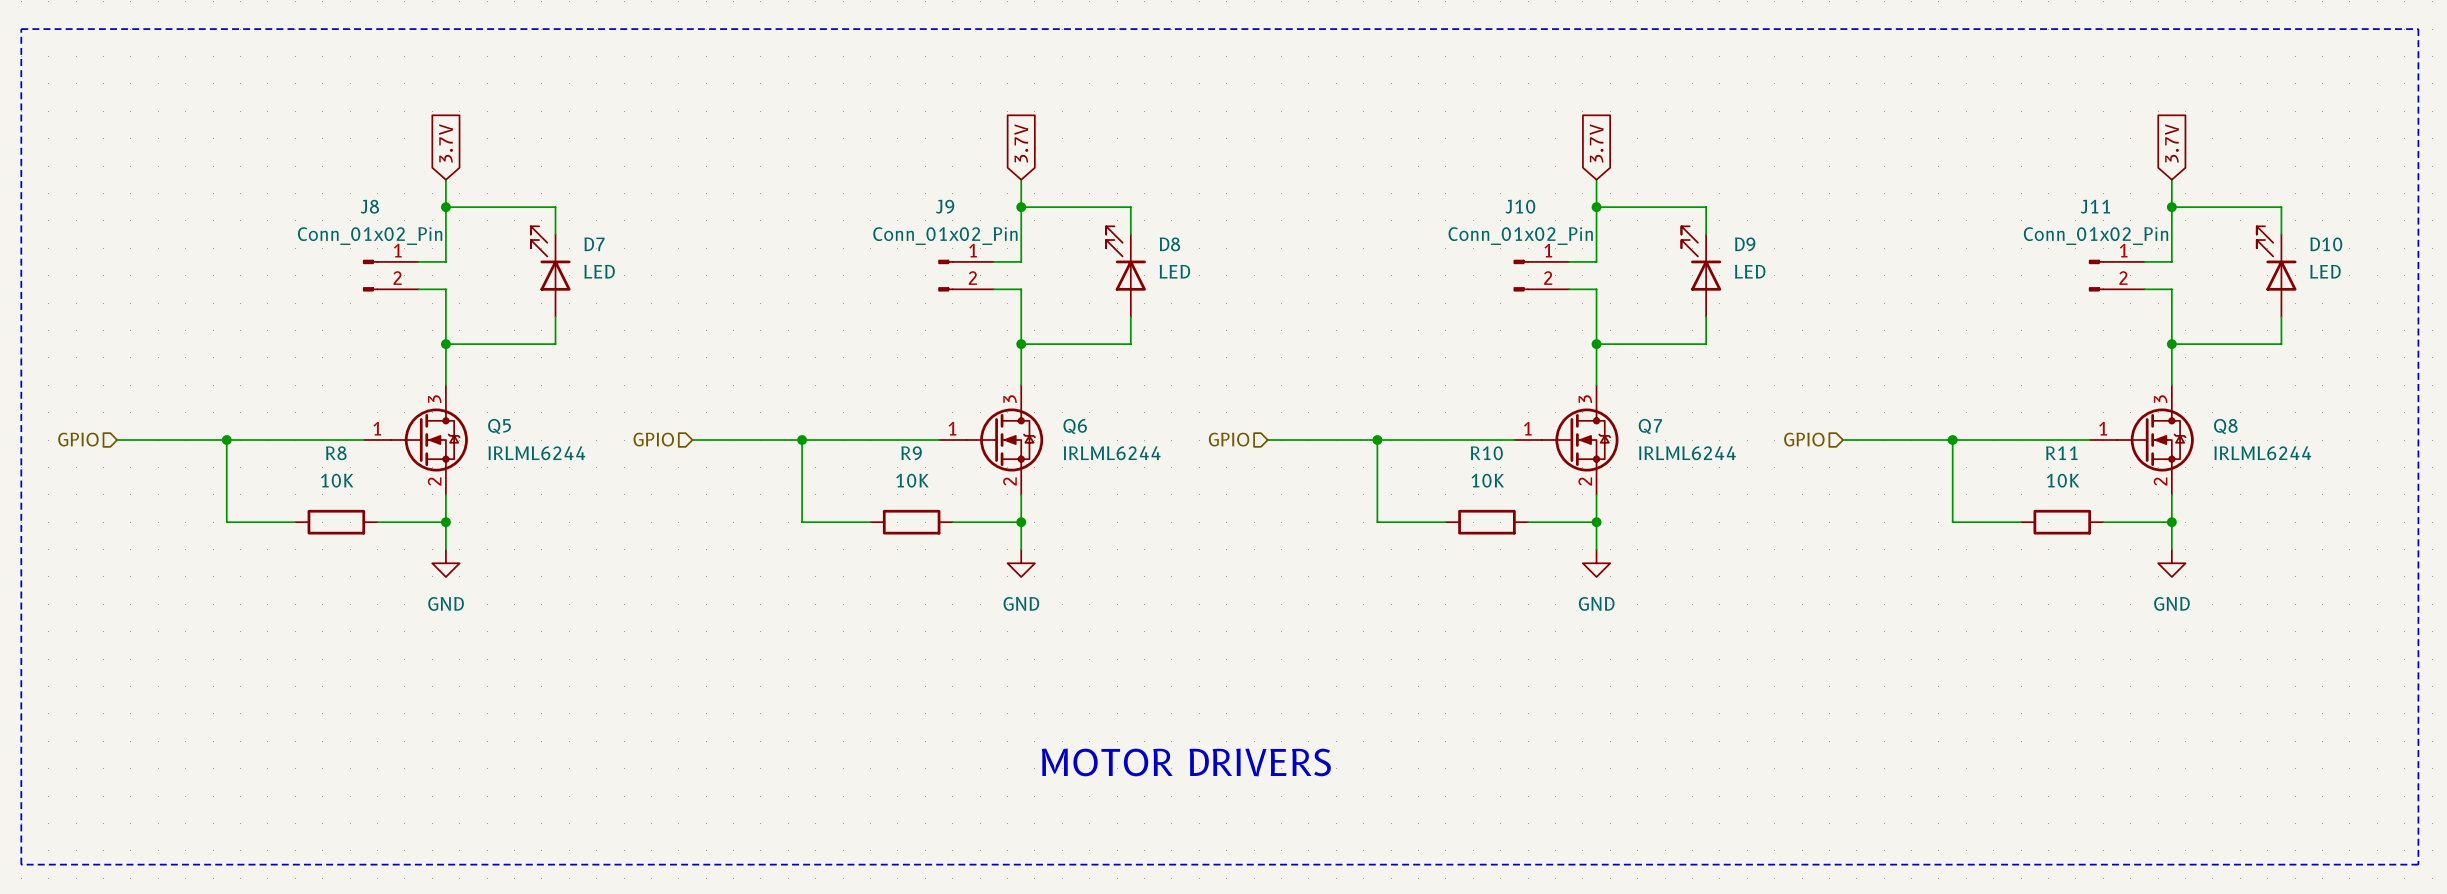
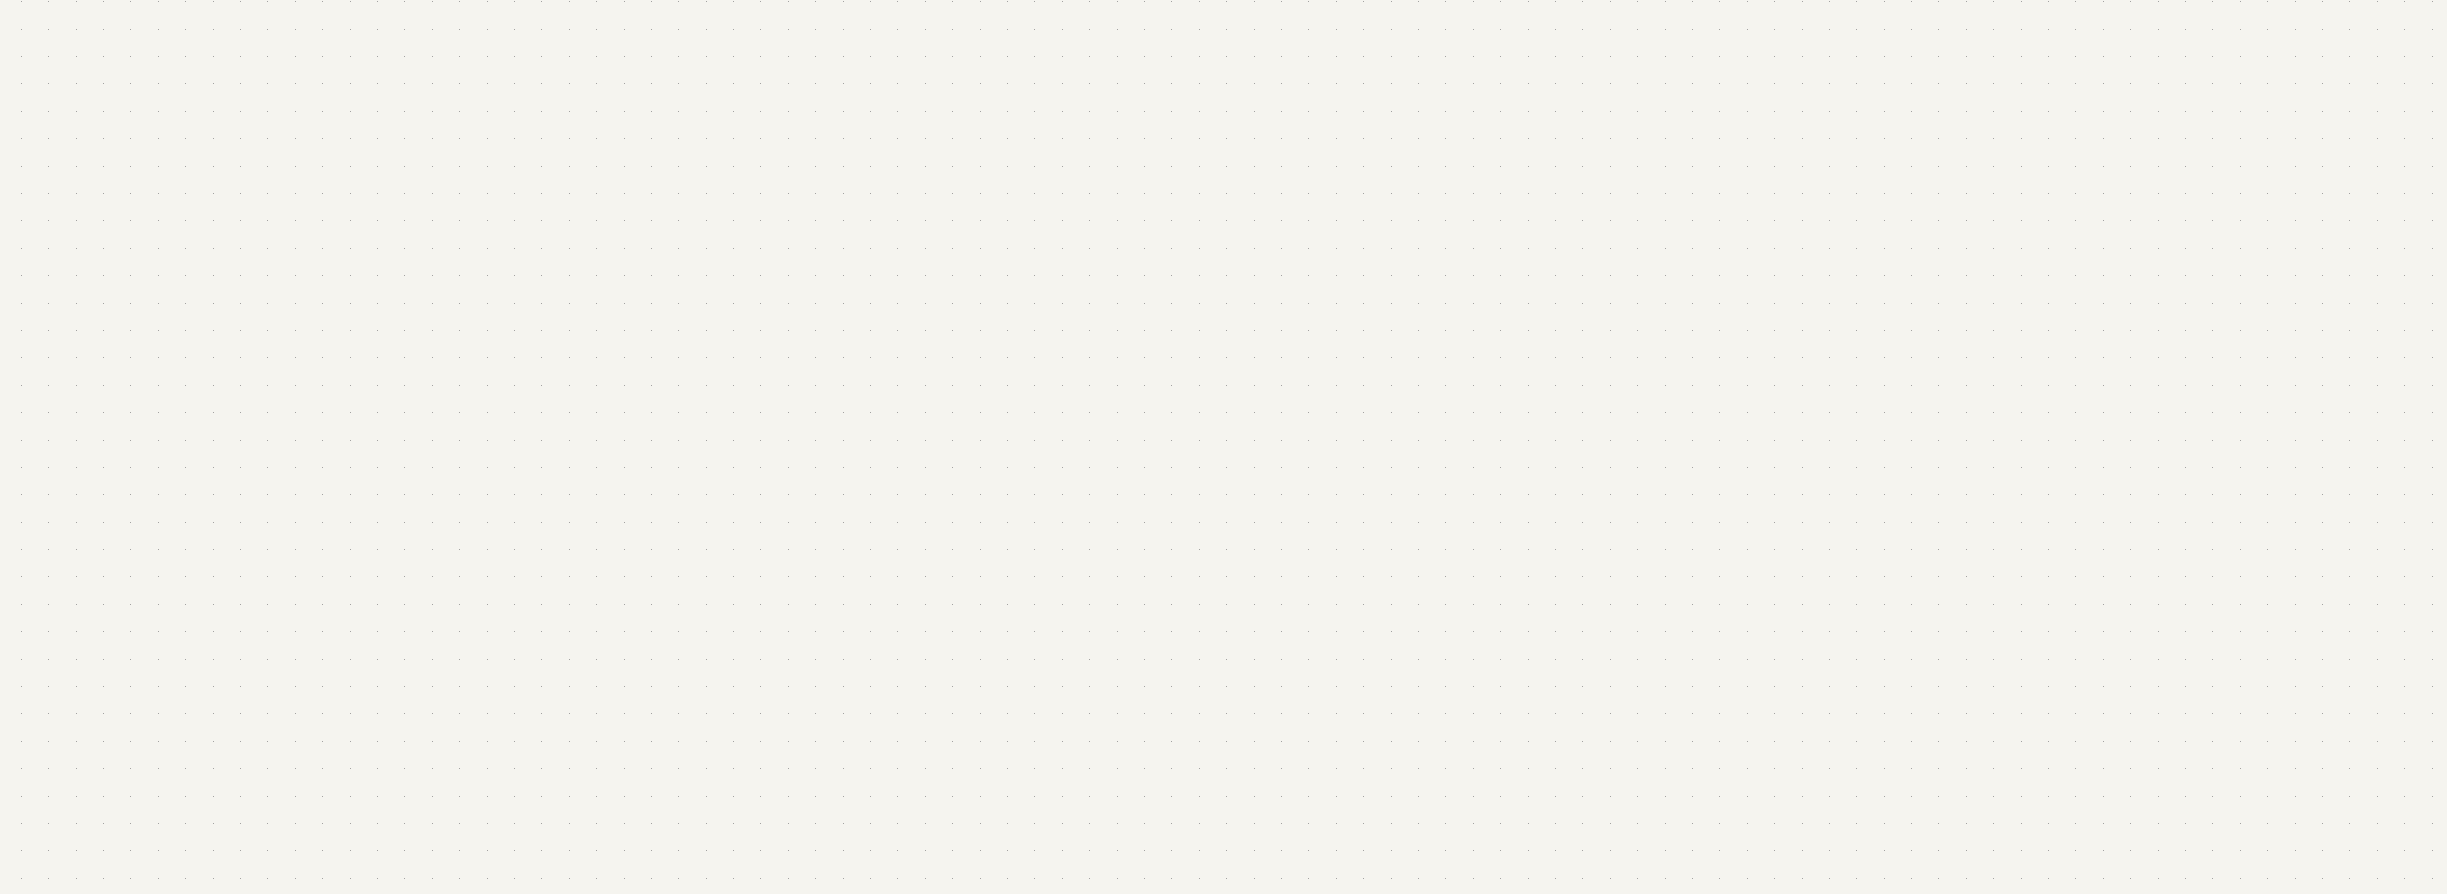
line: (21, 29) (2418, 29) (2418, 864) (21, 864) (21, 29) -> none
global label: 3.7V (446, 143) -> none
global label: 3.7V (1021, 143) -> none
global label: 3.7V (1596, 143) -> none
global label: 3.7V (2171, 143) -> none
wire: (445, 179) (445, 261) (418, 261) -> none
wire: (1021, 179) (1021, 261) (993, 261) -> none
wire: (1596, 179) (1596, 261) (1569, 261) -> none
wire: (2171, 179) (2171, 261) (2144, 261) -> none
wire: (445, 207) (555, 207) (555, 234) -> none
junction: (445, 207) -> none
wire: (1021, 207) (1130, 207) (1130, 234) -> none
junction: (1021, 207) -> none
wire: (1596, 207) (1706, 207) (1706, 234) -> none
junction: (1596, 207) -> none
wire: (2171, 207) (2281, 207) (2281, 234) -> none
junction: (2171, 207) -> none
D7: LED (550, 271) -> none
D8: LED (1126, 271) -> none
D9: LED (1701, 271) -> none
D10: LED (2276, 271) -> none
J8: Conn_01x02_Pin (390, 275) -> none
J9: Conn_01x02_Pin (966, 275) -> none
J10: Conn_01x02_Pin (1541, 275) -> none
J11: Conn_01x02_Pin (2116, 275) -> none
wire: (418, 289) (445, 289) (445, 385) -> none
wire: (993, 289) (1021, 289) (1021, 385) -> none
wire: (1569, 289) (1596, 289) (1596, 385) -> none
wire: (2144, 289) (2171, 289) (2171, 385) -> none
wire: (555, 316) (555, 344) (445, 344) -> none
wire: (1130, 316) (1130, 344) (1021, 344) -> none
wire: (1706, 316) (1706, 344) (1596, 344) -> none
wire: (2281, 316) (2281, 344) (2171, 344) -> none
junction: (445, 344) -> none
junction: (1021, 344) -> none
junction: (1596, 344) -> none
junction: (2171, 344) -> none
hierarchical label: GPIO (78, 439) -> none
hierarchical label: GPIO (653, 439) -> none
hierarchical label: GPIO (1229, 439) -> none
hierarchical label: GPIO (1804, 439) -> none
wire: (117, 440) (363, 440) -> none
wire: (226, 440) (226, 522) (295, 522) -> none
junction: (226, 440) -> none
Q5: IRLML6244 (415, 440) -> none
wire: (692, 440) (939, 440) -> none
wire: (802, 440) (802, 522) (870, 522) -> none
junction: (802, 440) -> none
Q6: IRLML6244 (991, 440) -> none
wire: (1267, 440) (1514, 440) -> none
wire: (1377, 440) (1377, 522) (1445, 522) -> none
junction: (1377, 440) -> none
Q7: IRLML6244 (1566, 440) -> none
wire: (1843, 440) (2089, 440) -> none
wire: (1952, 440) (1952, 522) (2021, 522) -> none
junction: (1952, 440) -> none
Q8: IRLML6244 (2141, 440) -> none
wire: (445, 494) (445, 549) -> none
wire: (1021, 494) (1021, 549) -> none
wire: (1596, 494) (1596, 549) -> none
wire: (2171, 494) (2171, 549) -> none
R8: 10K (336, 522) -> none
wire: (377, 522) (445, 522) -> none
junction: (445, 522) -> none
R9: 10K (911, 522) -> none
wire: (952, 522) (1021, 522) -> none
junction: (1021, 522) -> none
R10: 10K (1486, 522) -> none
wire: (1528, 522) (1596, 522) -> none
junction: (1596, 522) -> none
R11: 10K (2062, 522) -> none
wire: (2103, 522) (2171, 522) -> none
junction: (2171, 522) -> none
power symbol: GND (445, 563) -> none
power symbol: GND (1021, 563) -> none
power symbol: GND (1596, 563) -> none
power symbol: GND (2171, 563) -> none
text: MOTOR DRIVERS (1186, 762) -> none

